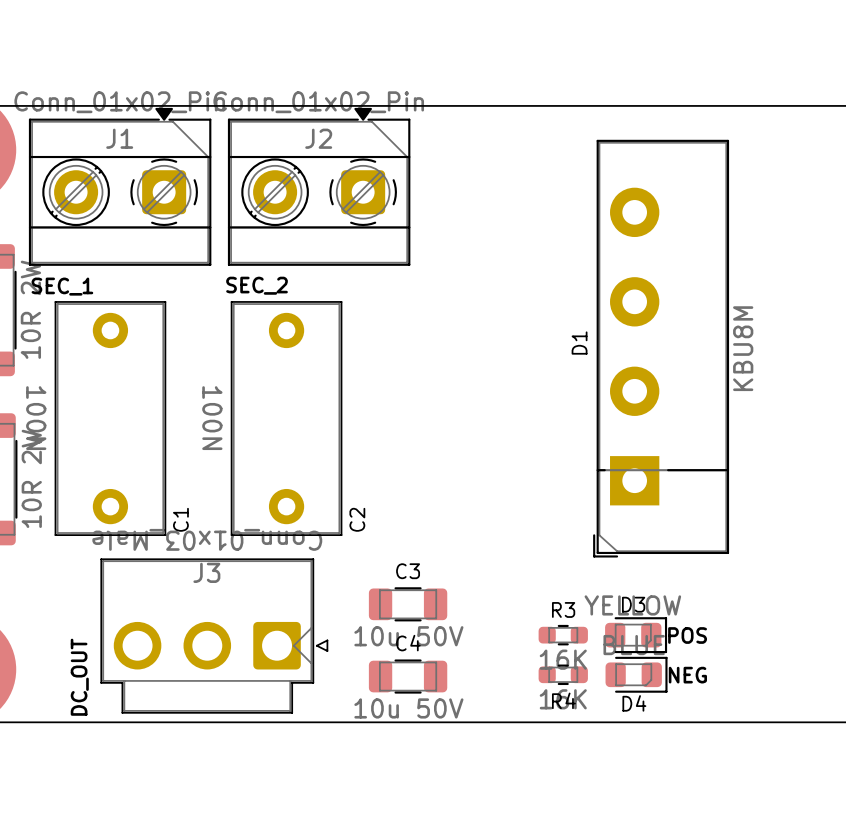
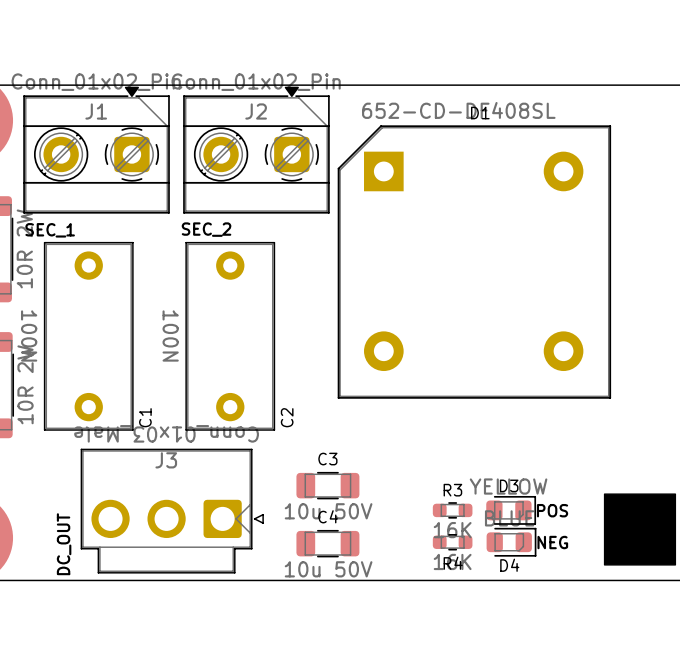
D1 footprint: [593, 139, 730, 558] -> [337, 125, 612, 399]
D1 name position: D1 (579, 343) -> D1 (480, 113)
D1 value: KBU8M (743, 348) -> 652-CD-DF408SL (458, 110)
drawing: none -> [603, 493, 677, 566]

